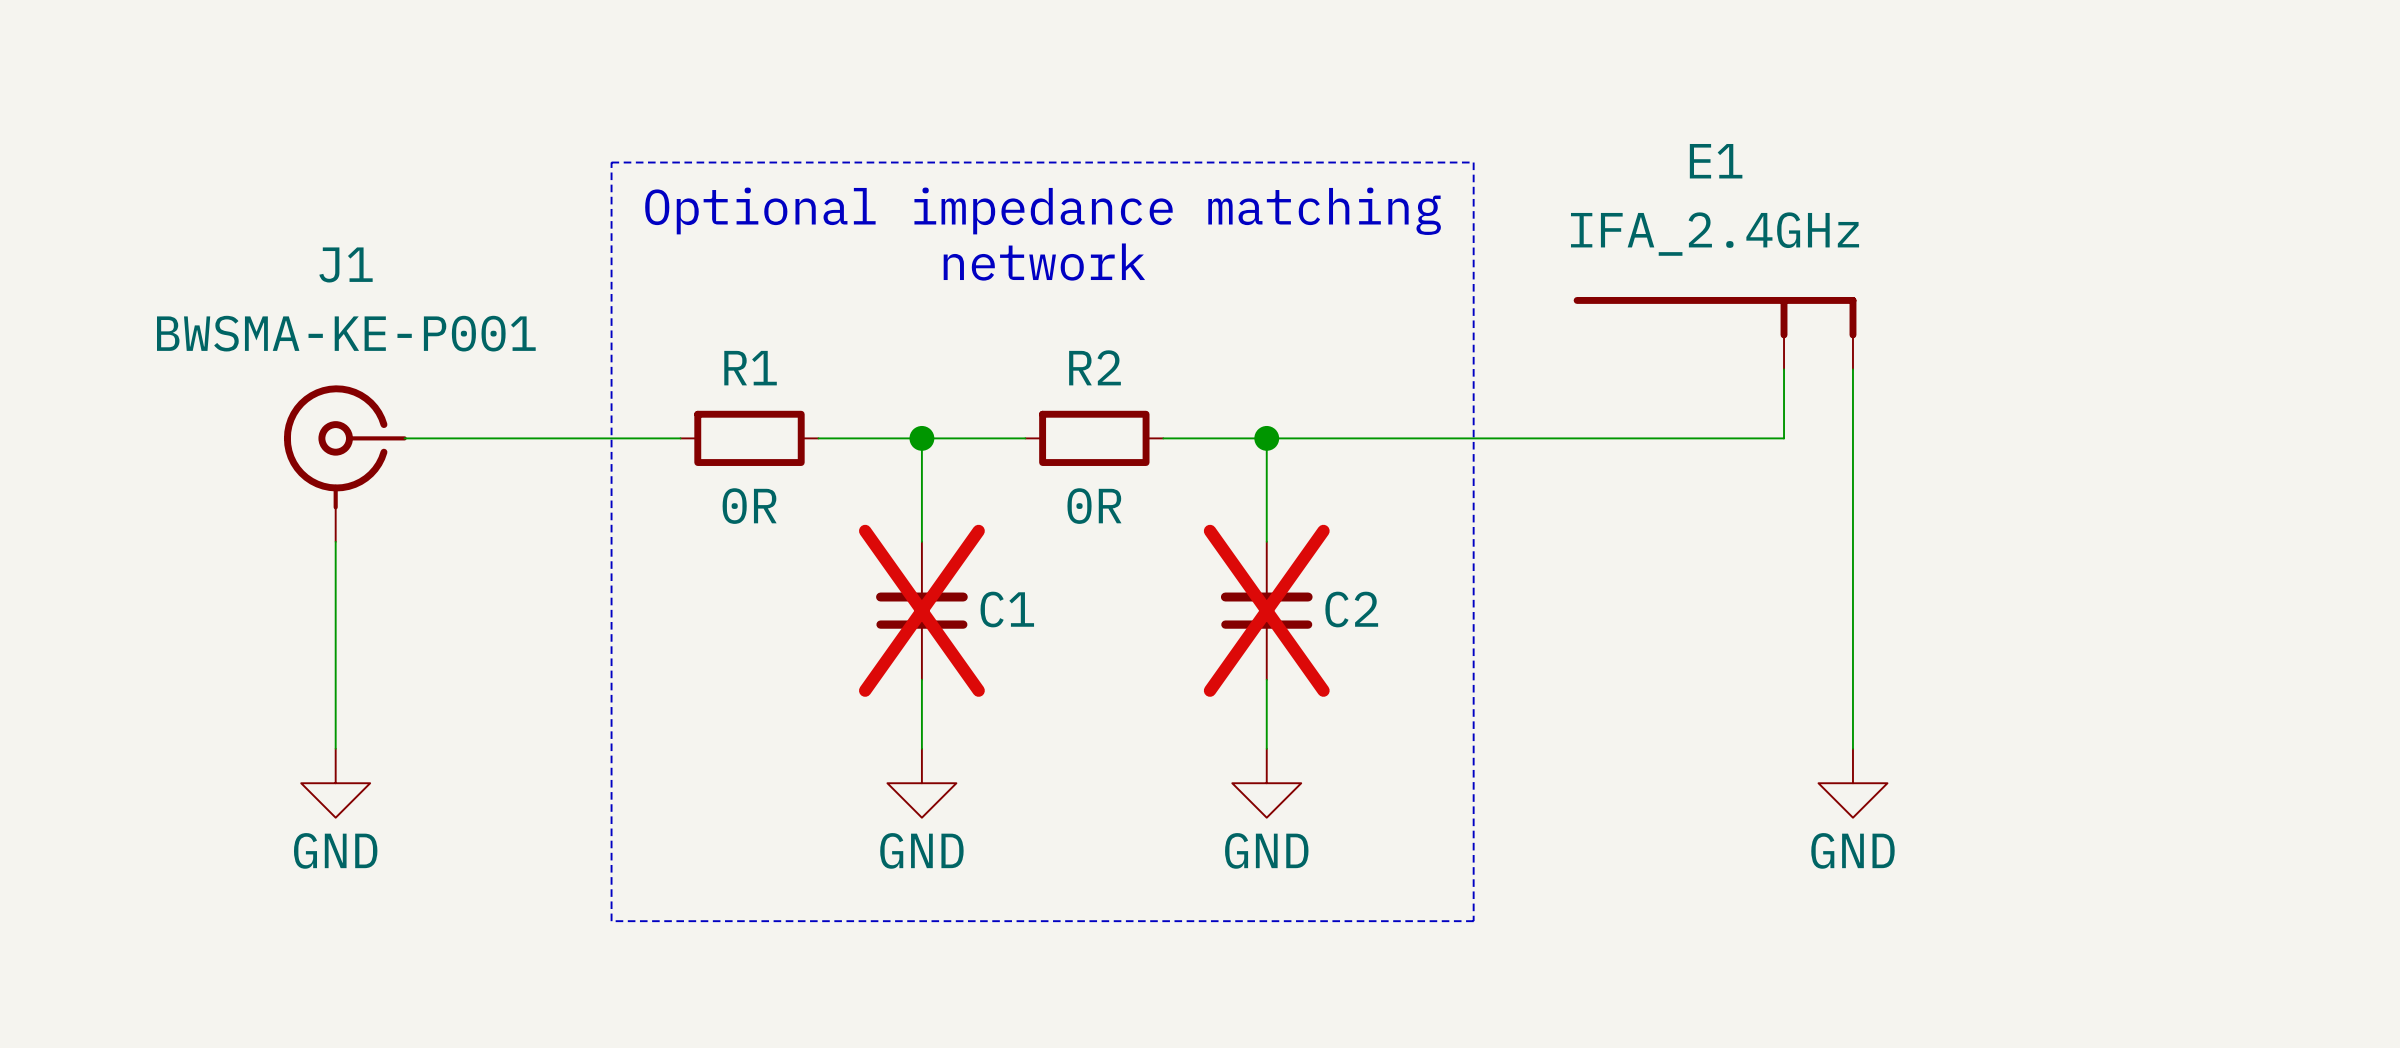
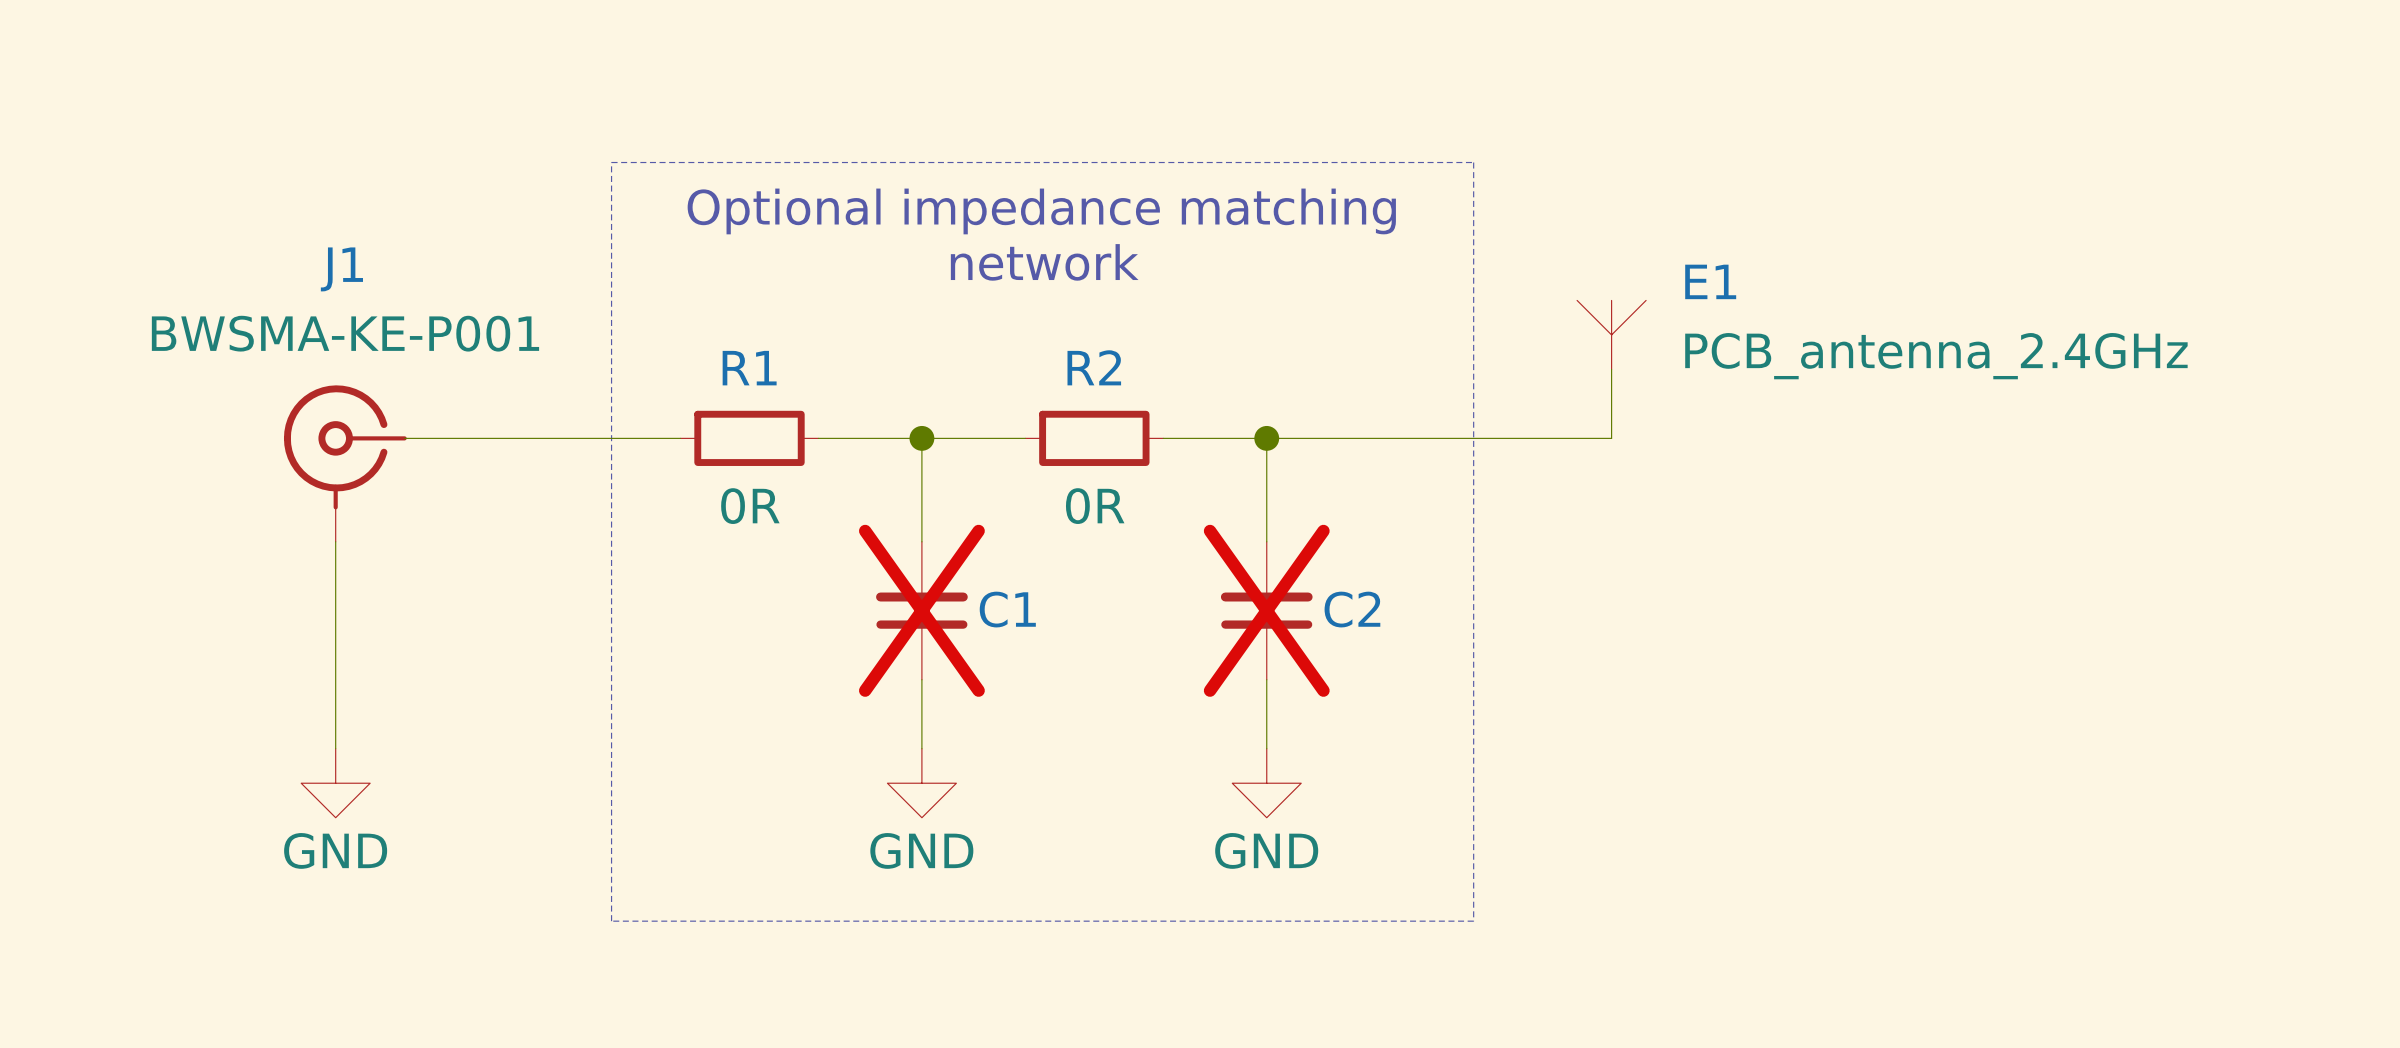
E1 name position: E1 (1716, 161) -> E1 (1710, 281)
E1 value: IFA_2.4GHz (1715, 234) -> PCB_antenna_2.4GHz (1936, 356)
E1 symbol: [1573, 297, 1857, 370] -> [1577, 300, 1647, 370]
wire: (1784, 369) (1784, 438) (1611, 438) -> (1611, 369) (1611, 438)
wire: (1852, 369) (1852, 748) -> none
power symbol: GND (1852, 783) -> none

